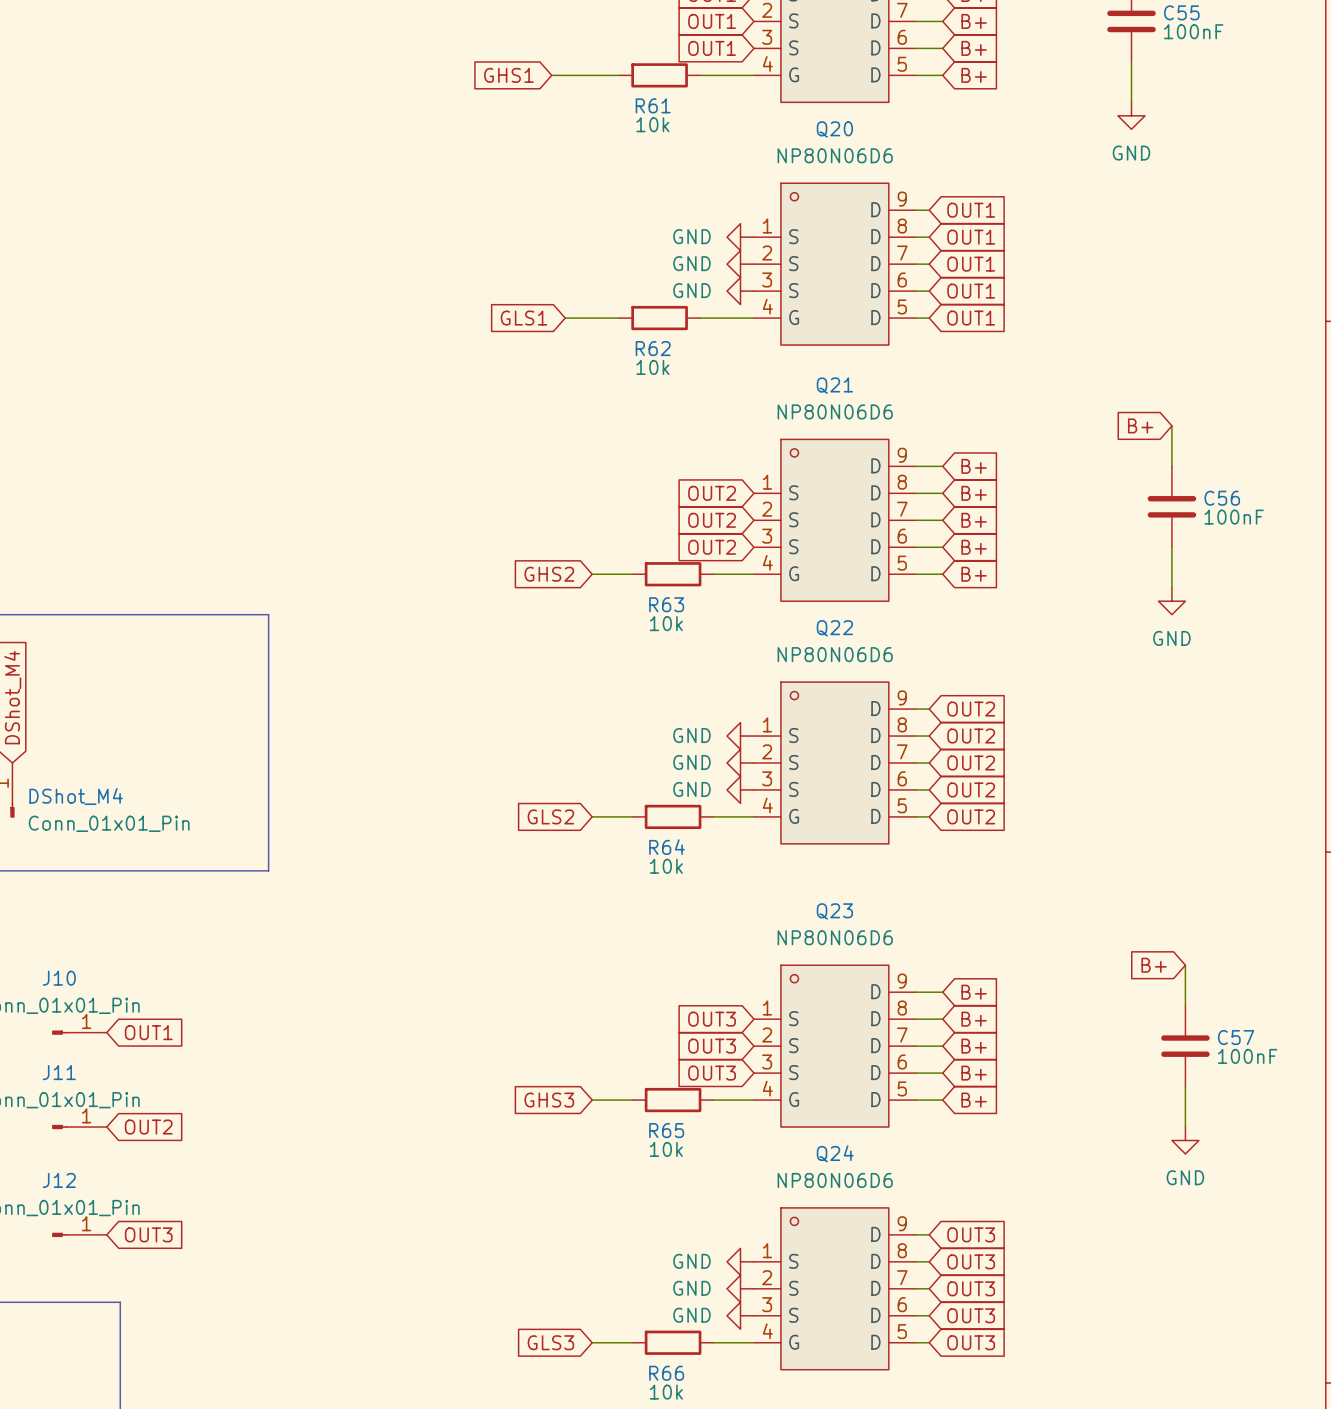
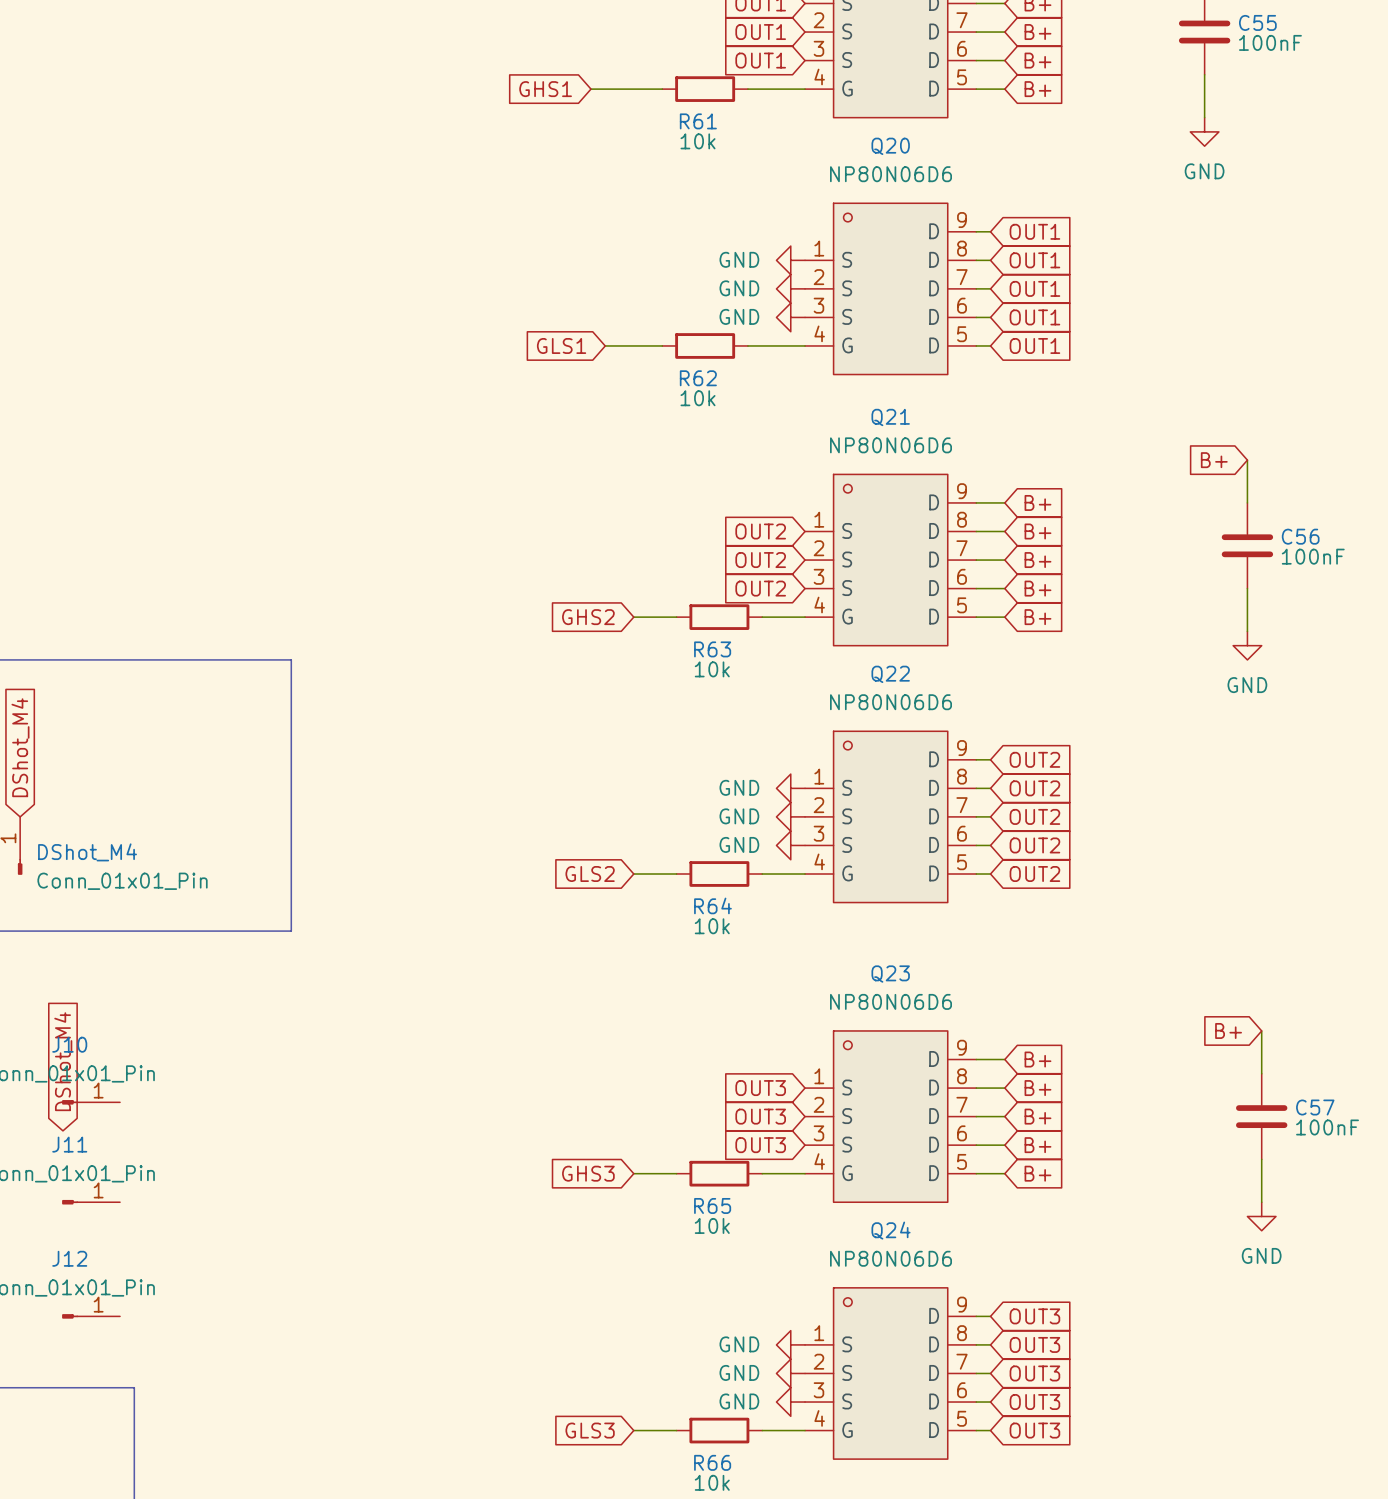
global label: none -> DShot_M4 (63, 1061)
global label: OUT1 (148, 1032) -> none
global label: OUT2 (148, 1127) -> none
global label: OUT3 (148, 1234) -> none

